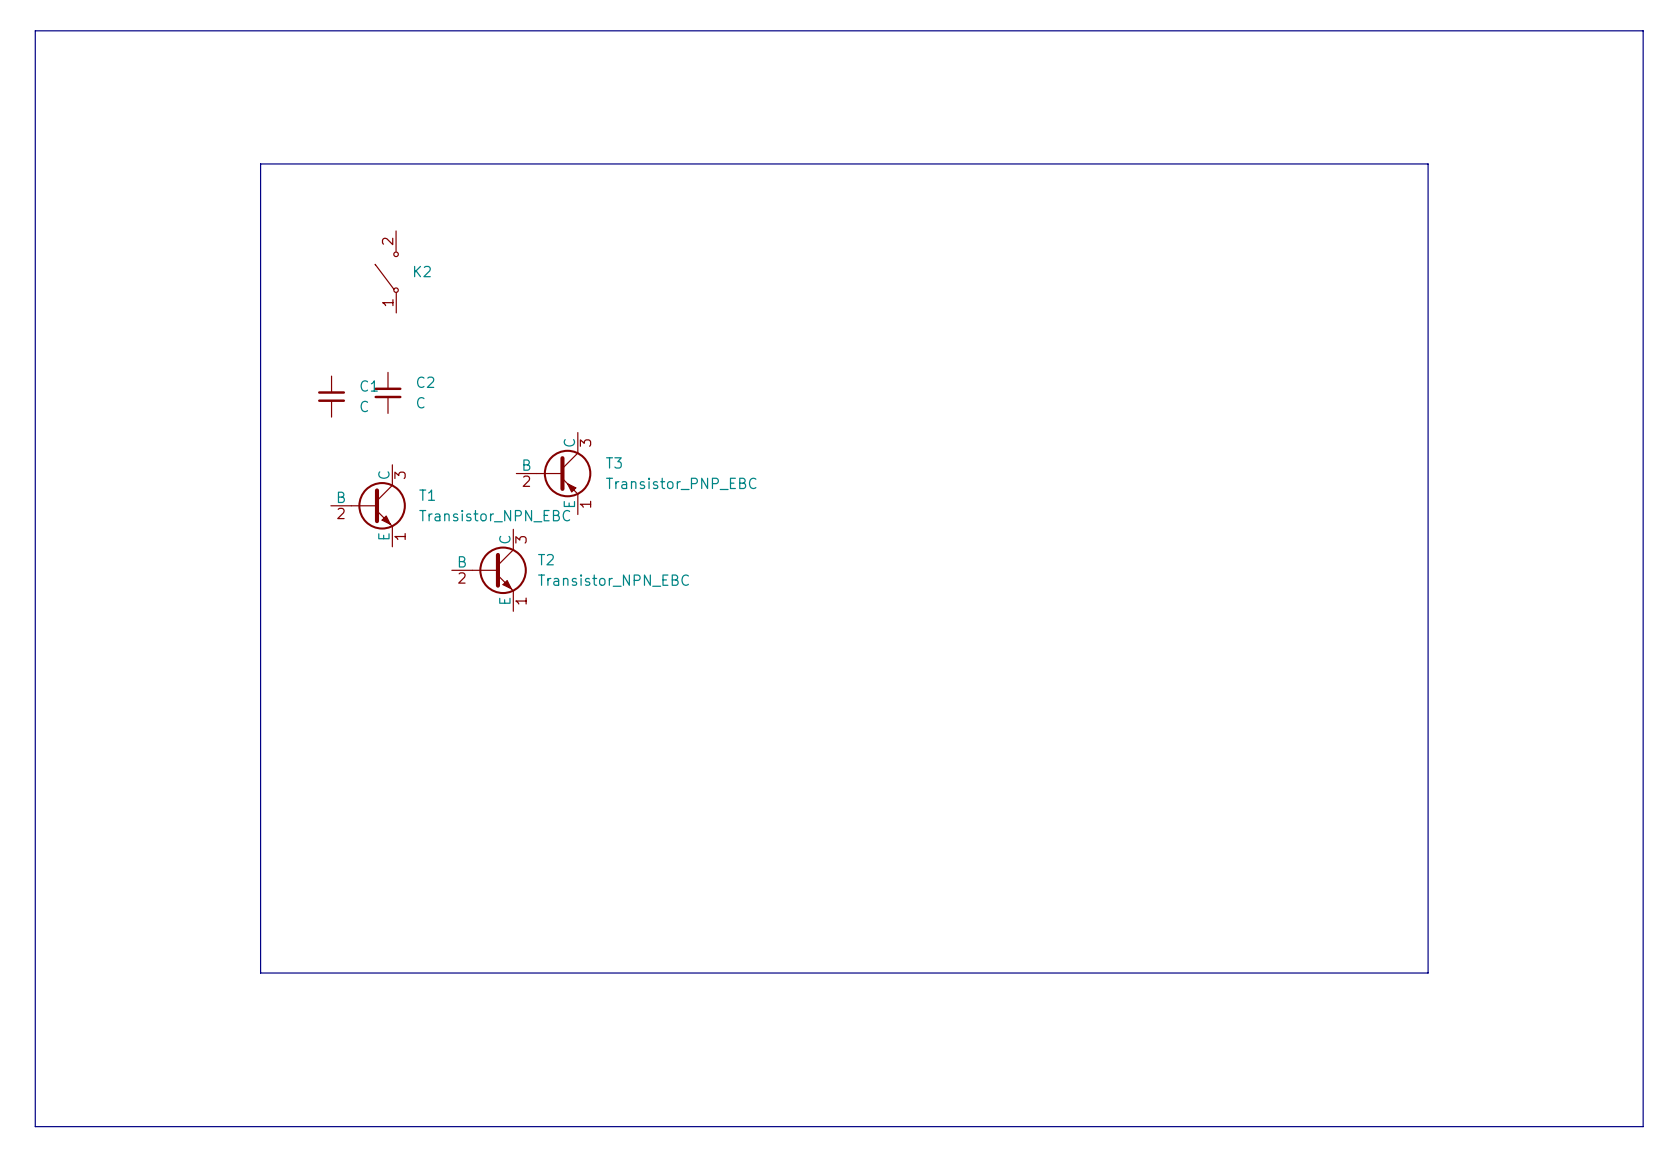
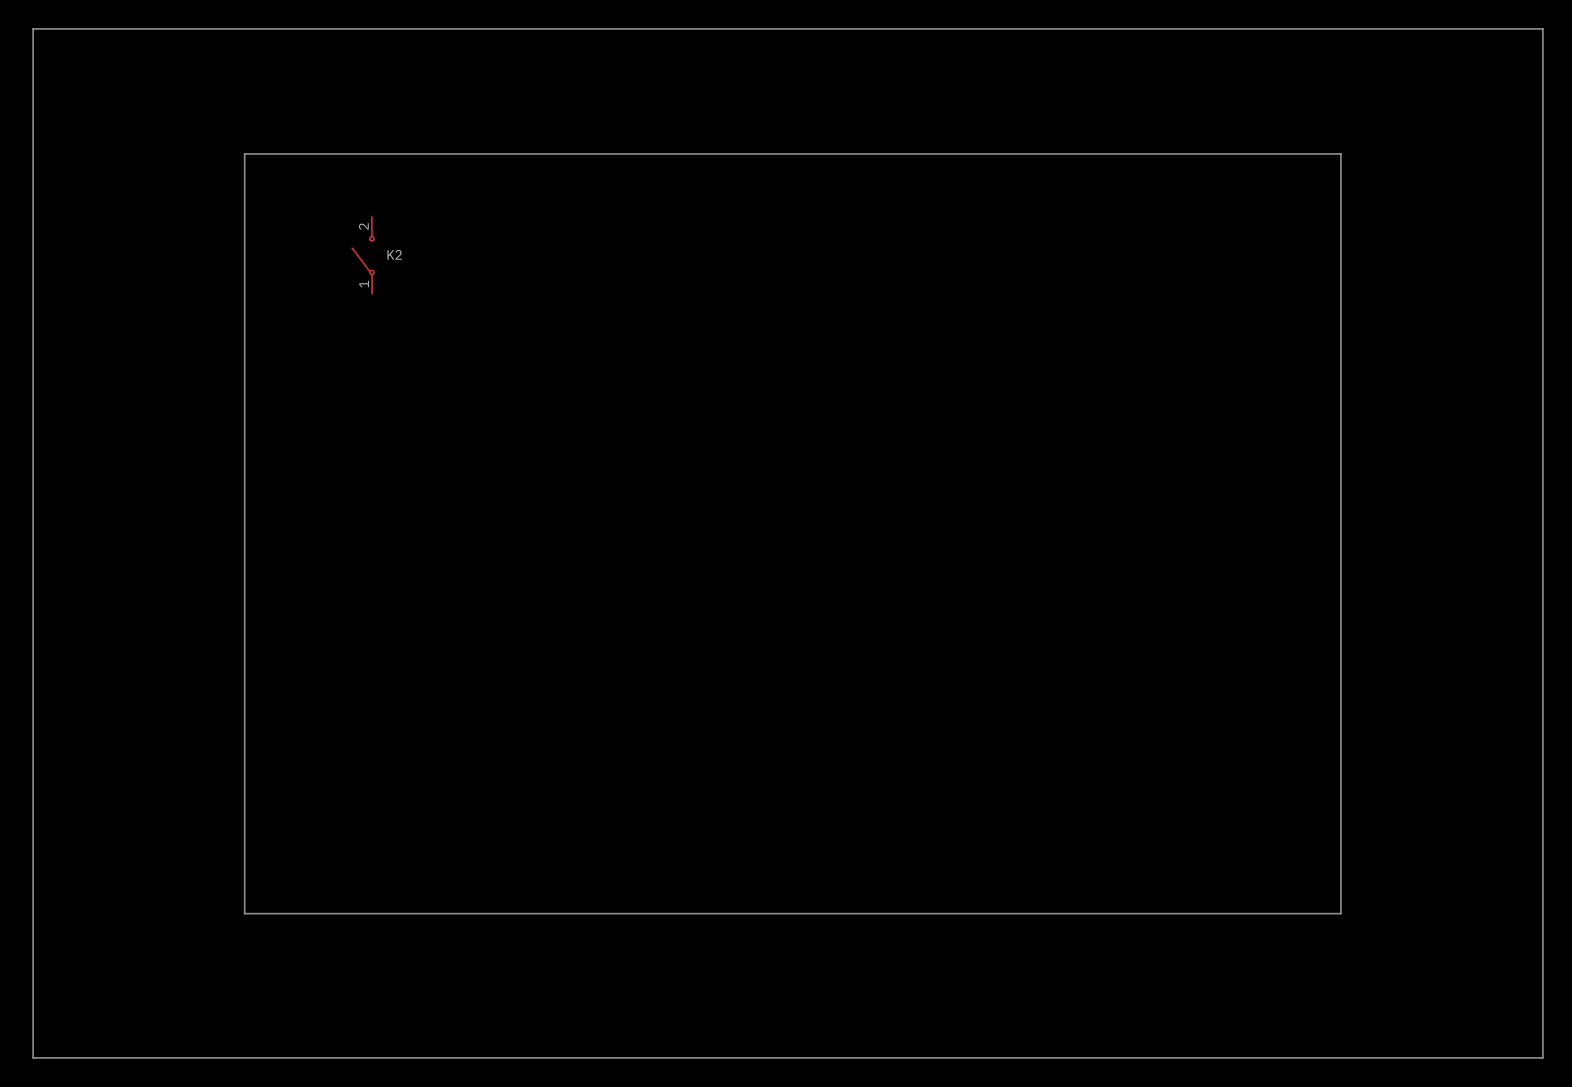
C2: C (387, 392) -> none
C1: C (331, 396) -> none
T3: Transistor_PNP_EBC (553, 473) -> none
T1: Transistor_NPN_EBC (368, 505) -> none
T2: Transistor_NPN_EBC (489, 570) -> none

